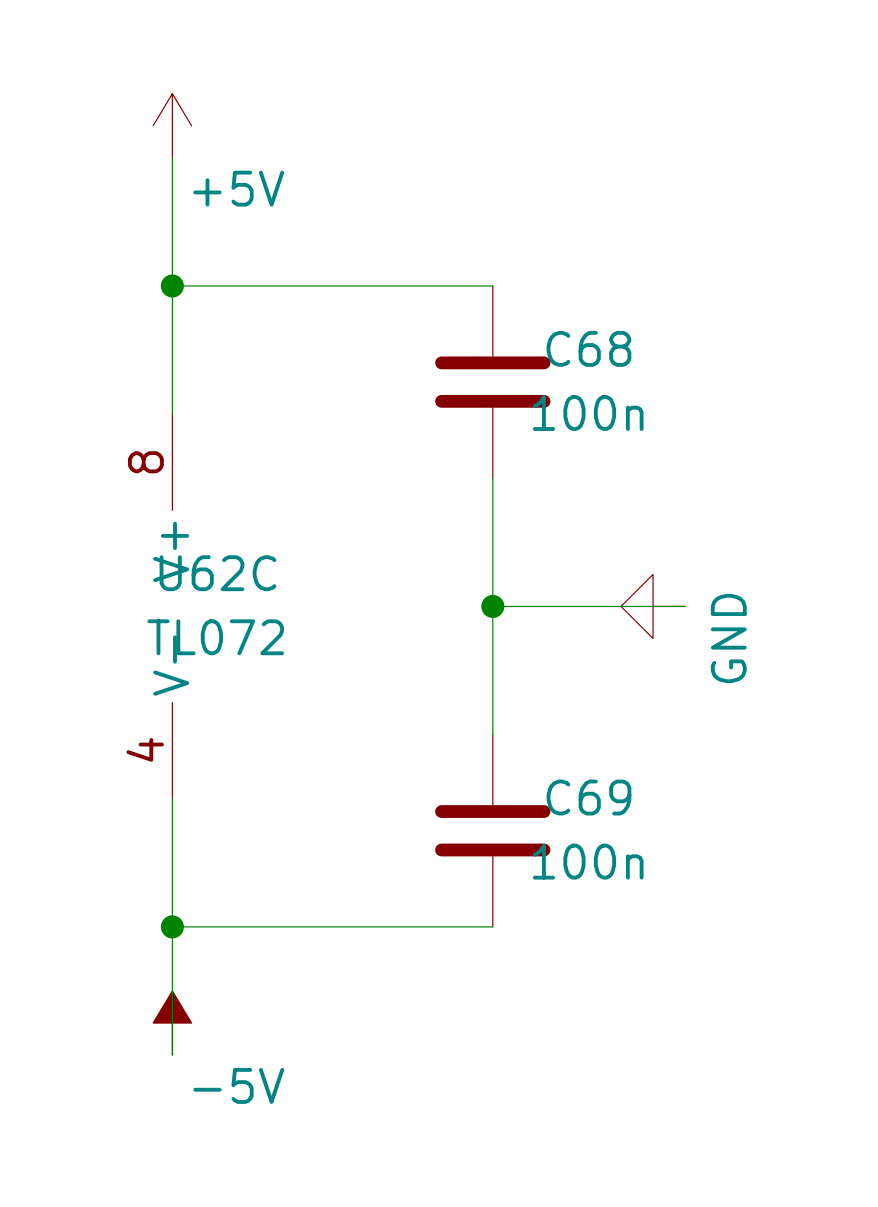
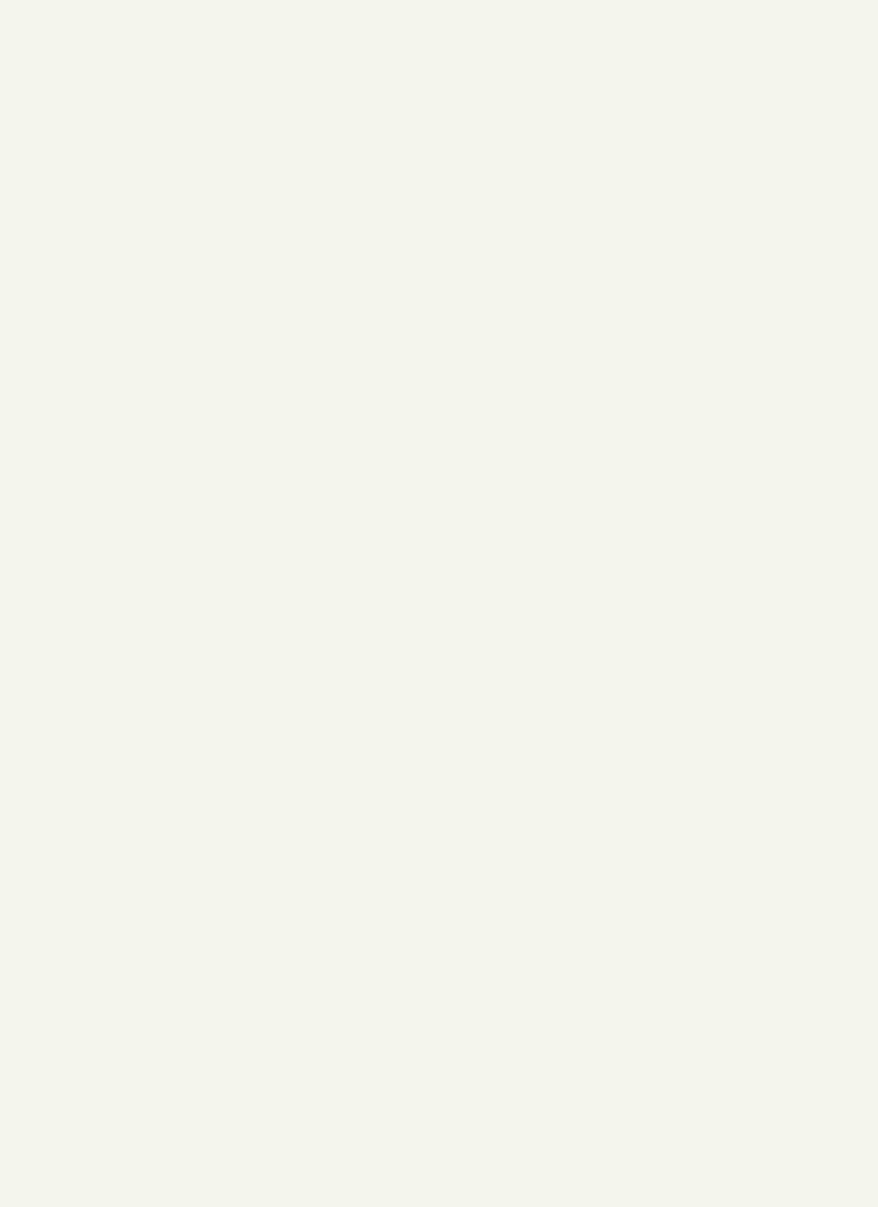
power symbol: +5V (172, 125) -> none
wire: (172, 157) (172, 414) -> none
wire: (172, 285) (492, 285) -> none
junction: (172, 285) -> none
C68: 100n (492, 382) -> none
wire: (492, 478) (492, 734) -> none
U62C: TL072 (172, 606) -> none
wire: (492, 606) (685, 606) -> none
junction: (492, 606) -> none
power symbol: GND (653, 606) -> none
wire: (172, 798) (172, 1055) -> none
C69: 100n (492, 830) -> none
wire: (172, 926) (492, 926) -> none
junction: (172, 926) -> none
power symbol: -5V (172, 1023) -> none

